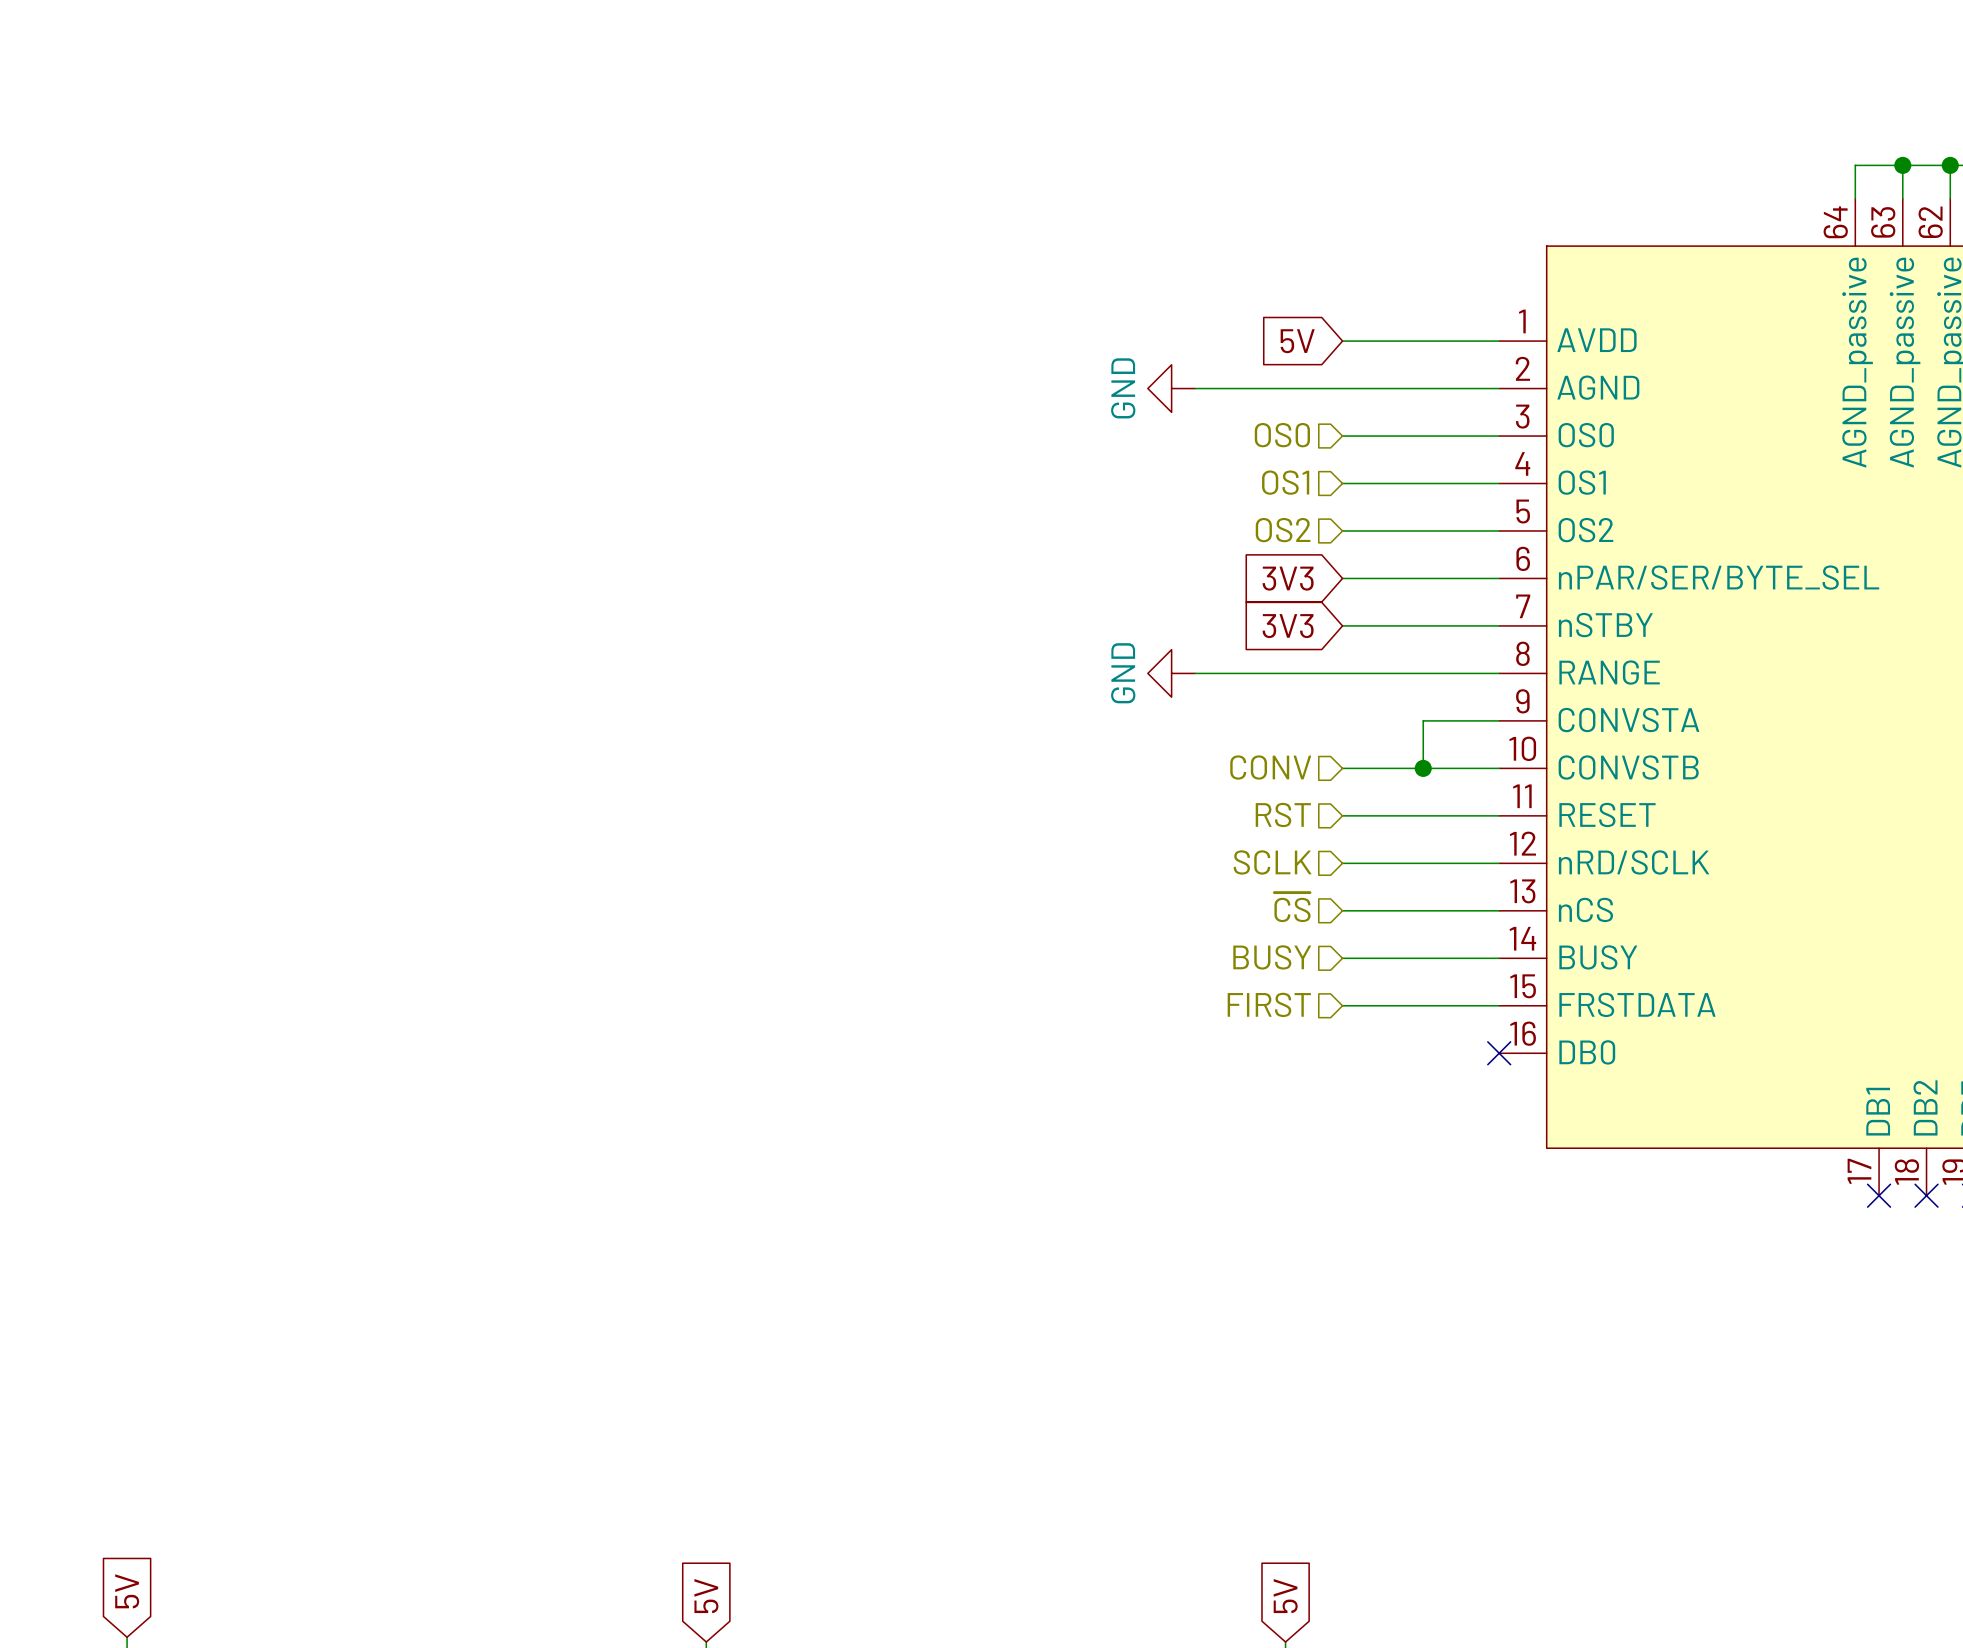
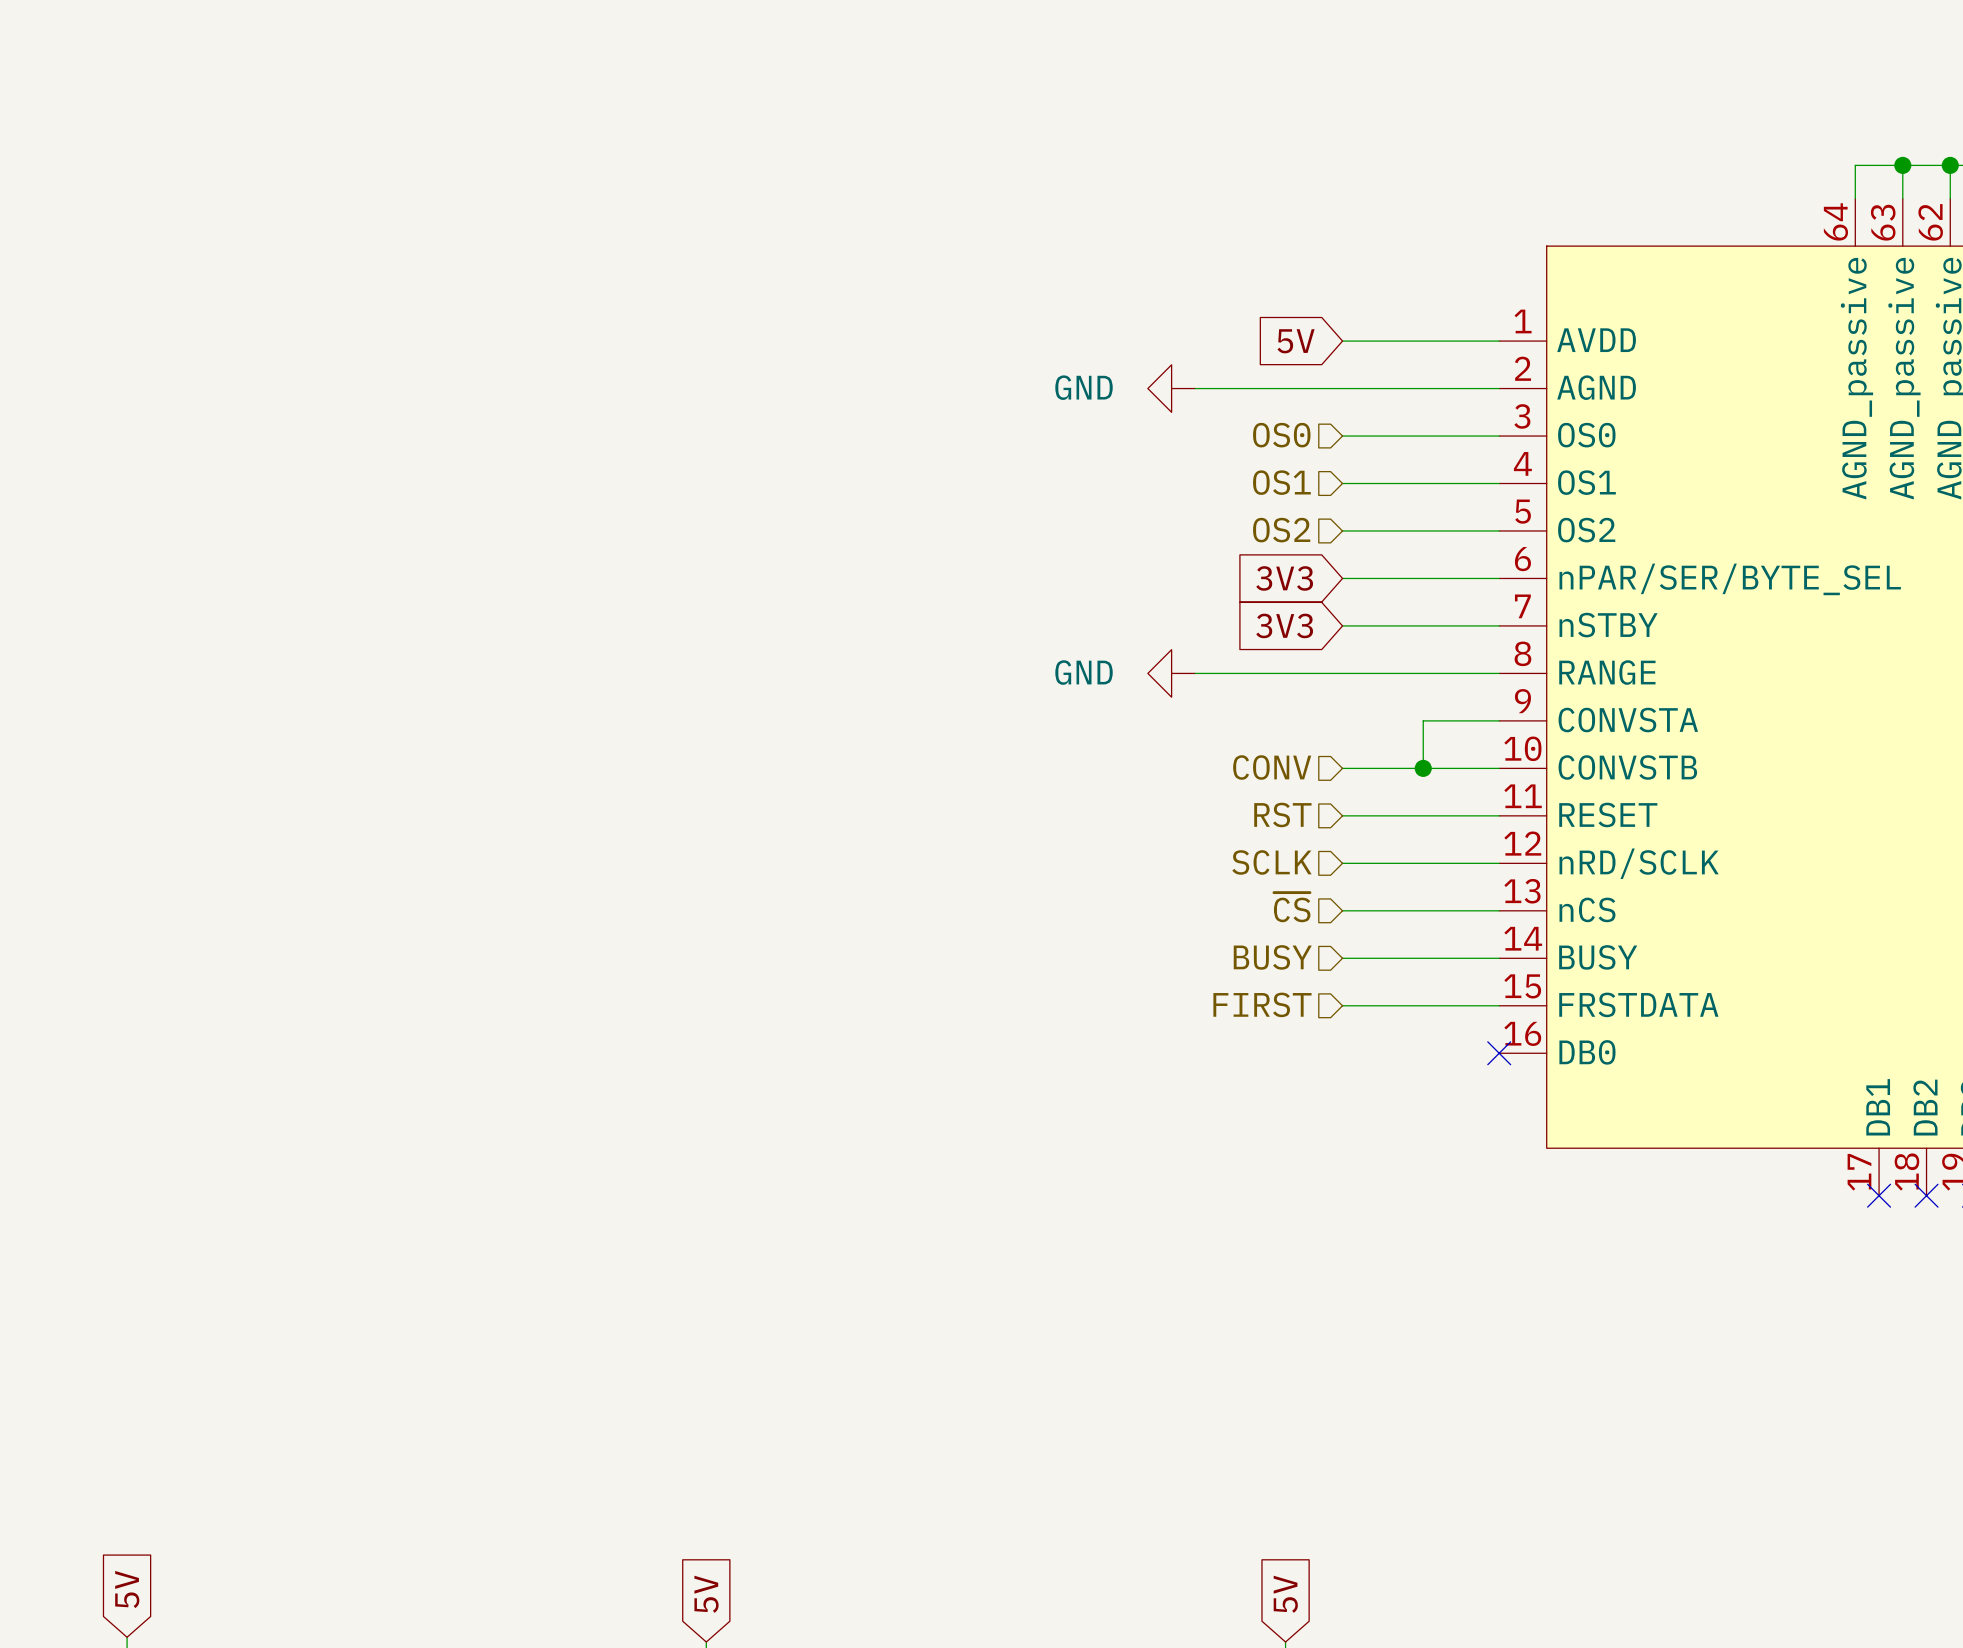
power symbol text rotation: 0° (1123, 388) -> 90° clockwise (1084, 387)
power symbol text rotation: 0° (1123, 673) -> 90° clockwise (1084, 672)

